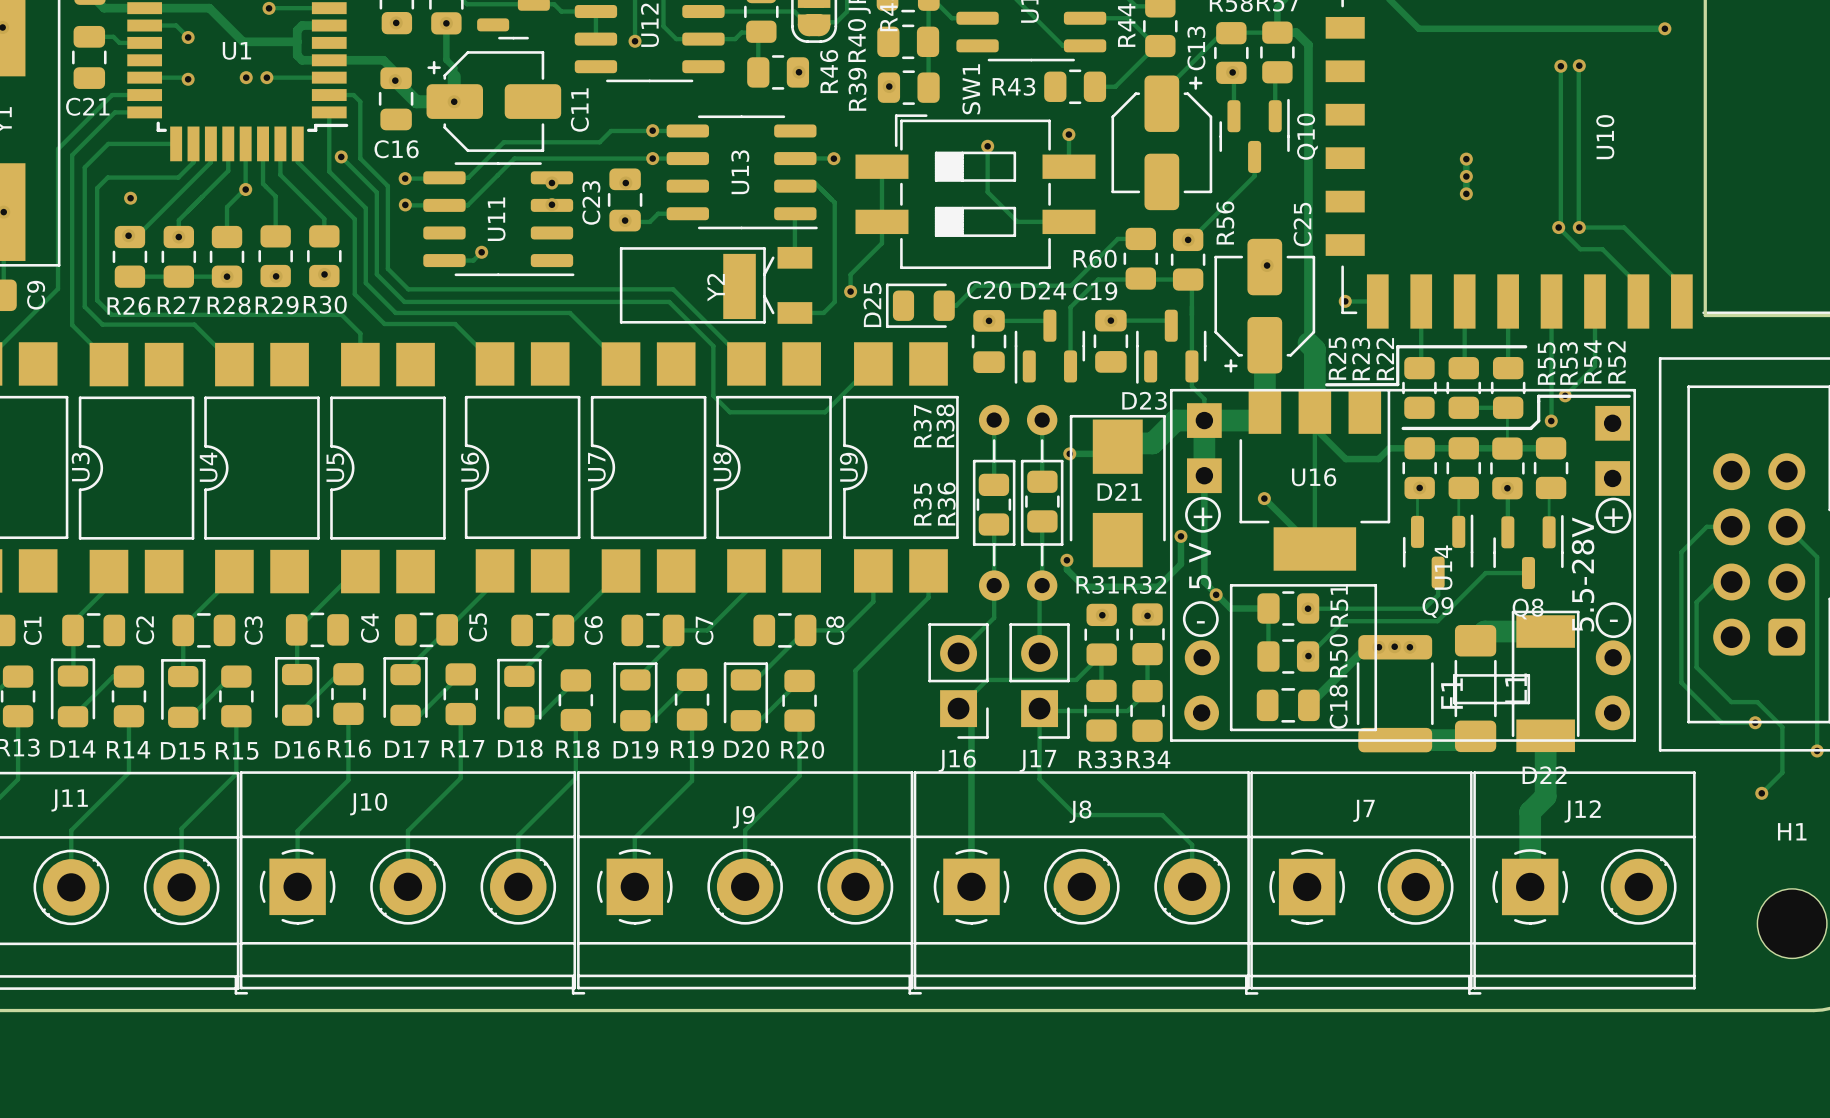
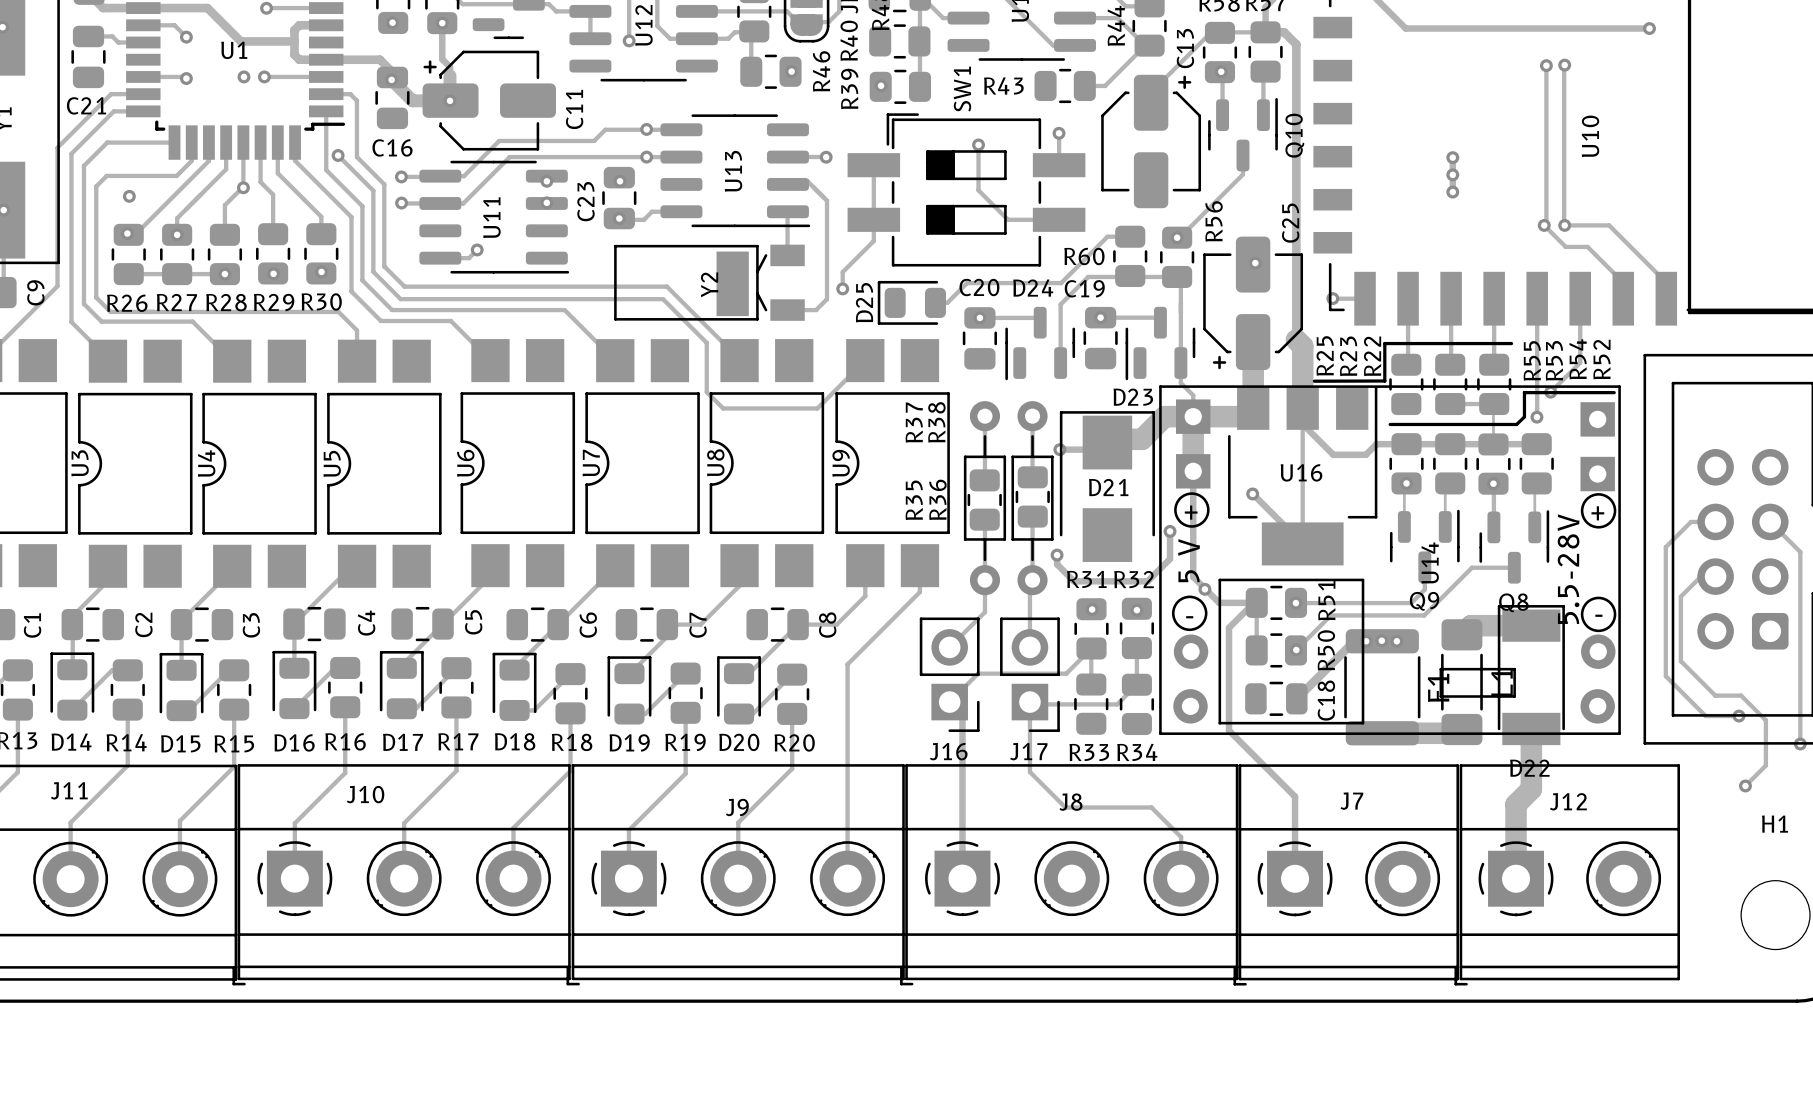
track: none -> (1256, 602) (1253, 602) (1229, 627) (1229, 730) (1295, 796) (1295, 878)

